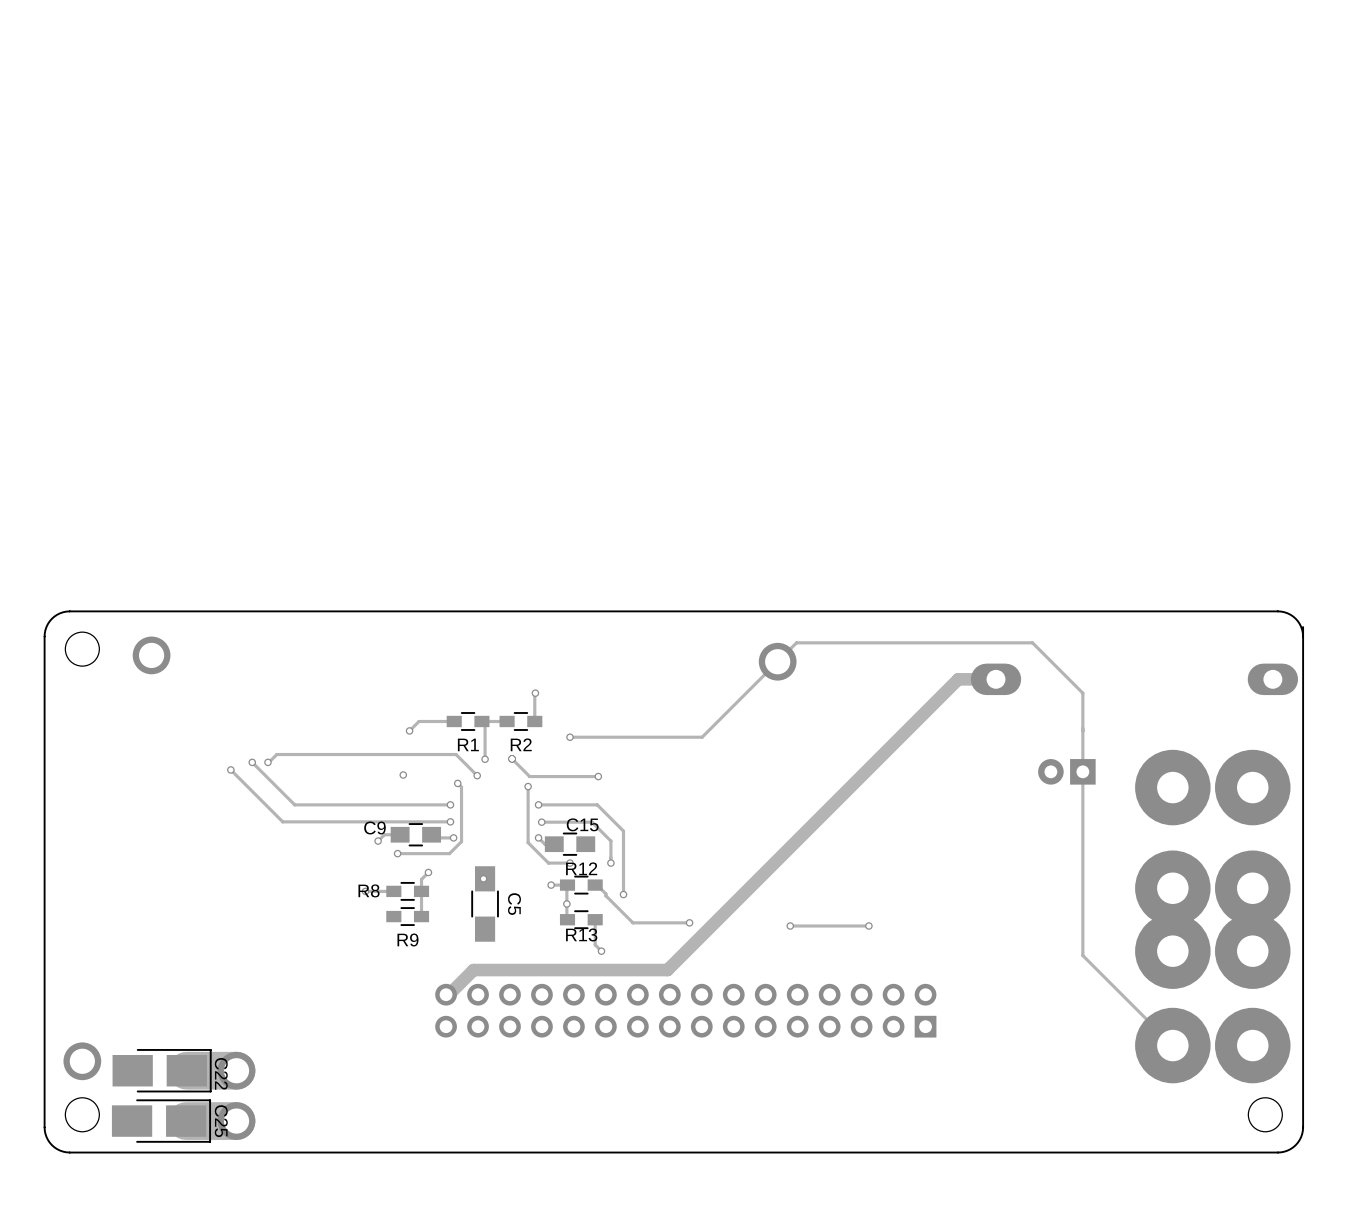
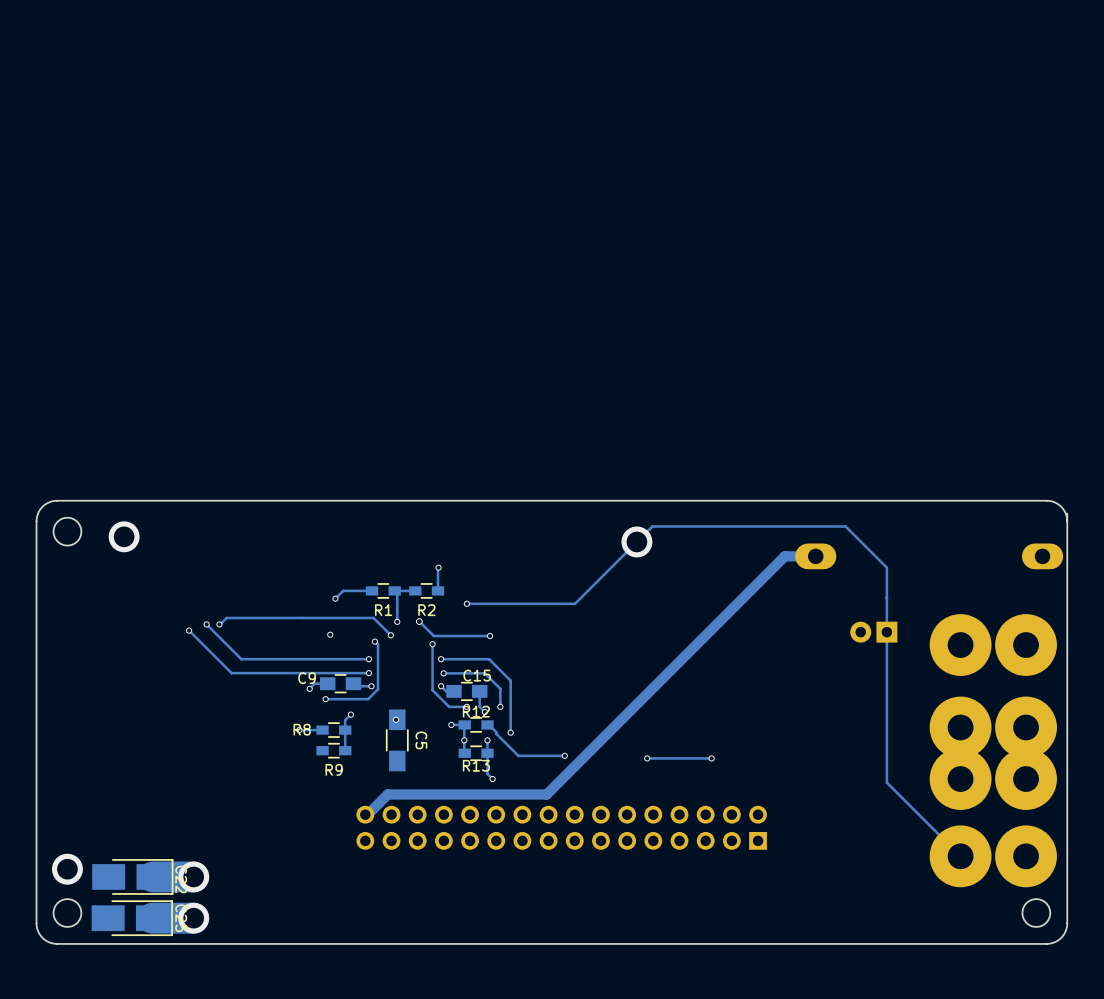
track: none -> (479, 691) (479, 706) (484, 712)
via: none -> (484, 712)
track: none -> (487, 740) (487, 753)
via: none -> (487, 740)

